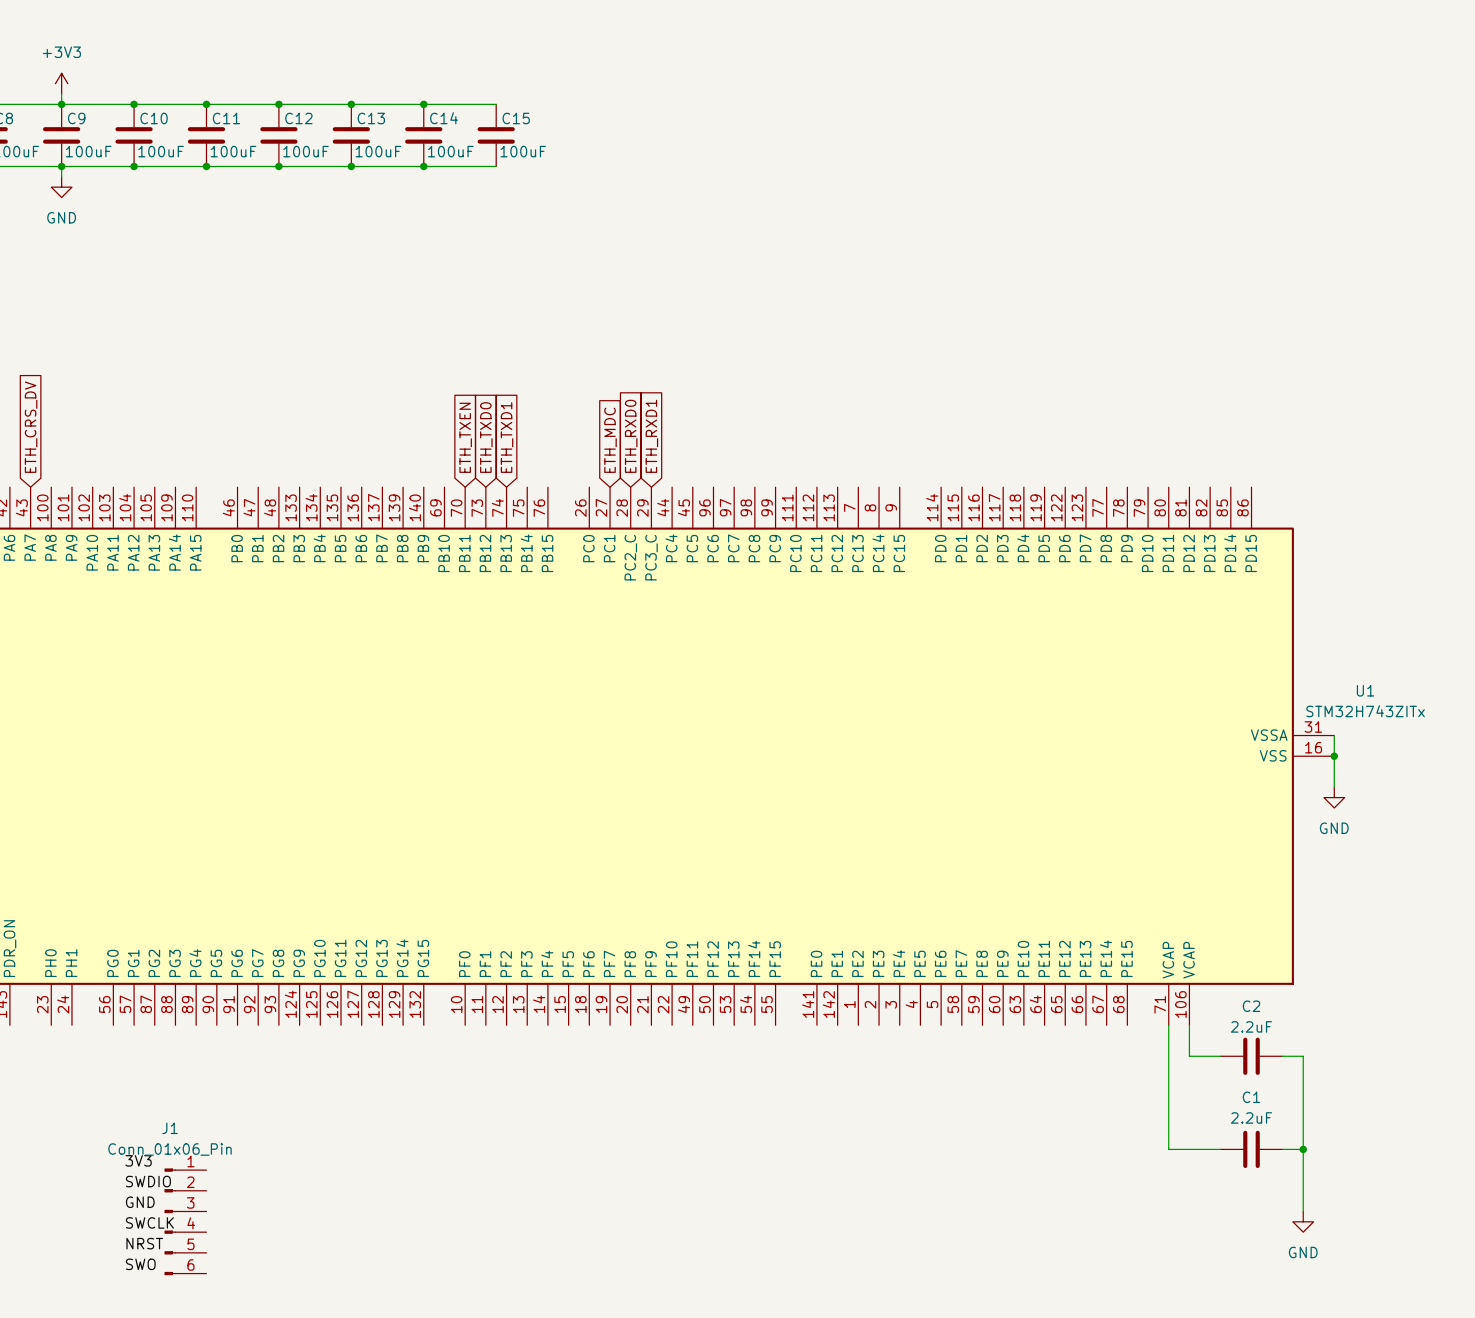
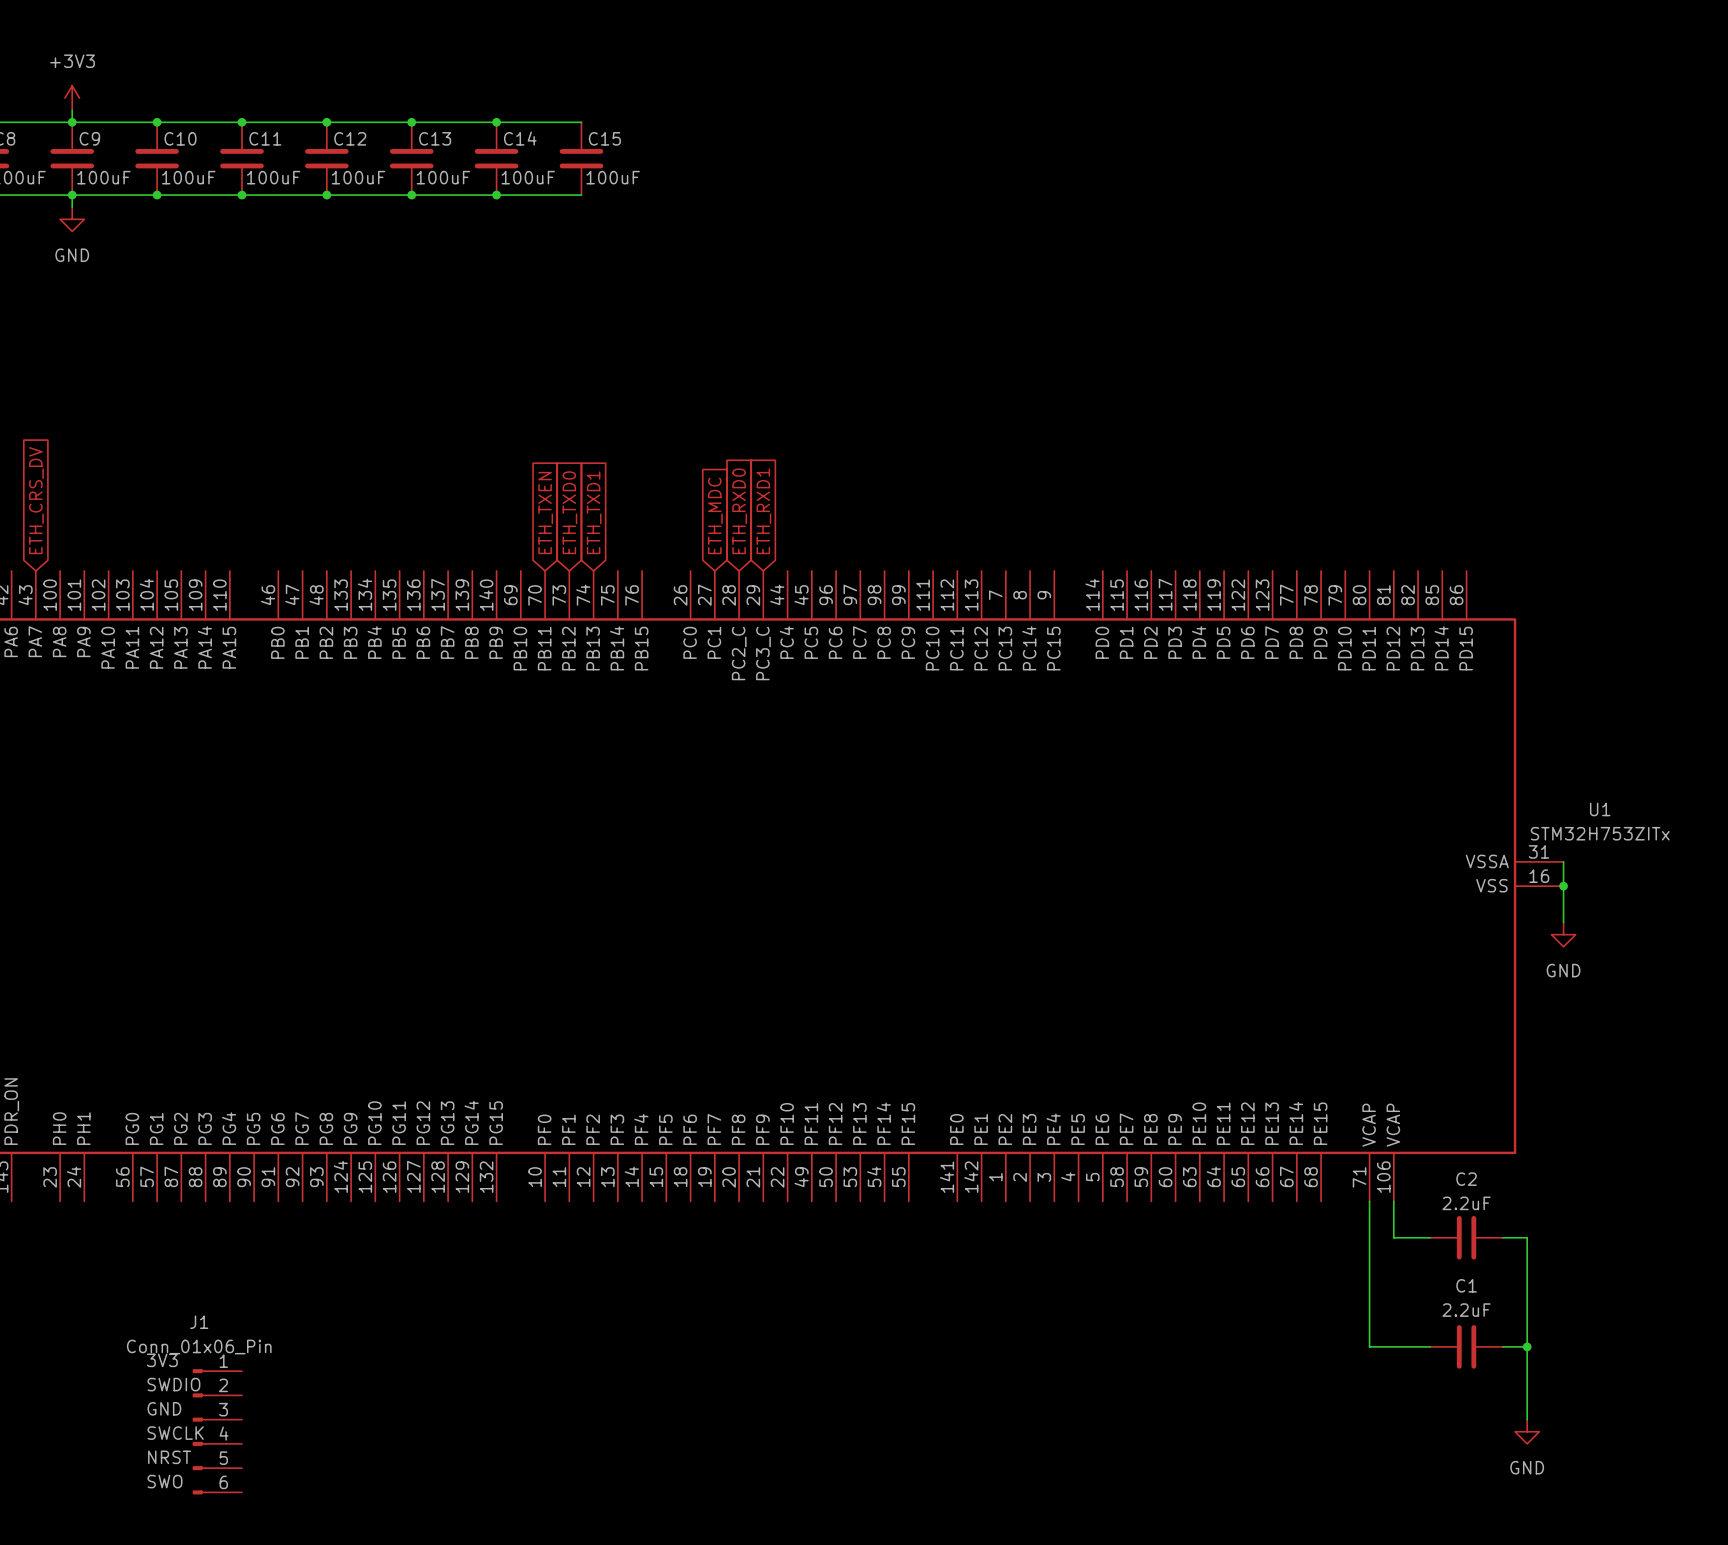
U1 value: STM32H743ZITx (1365, 711) -> STM32H753ZITx (1600, 833)

